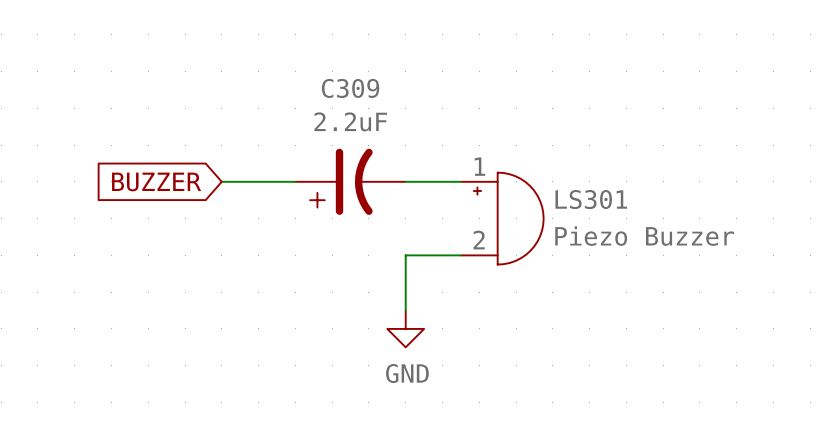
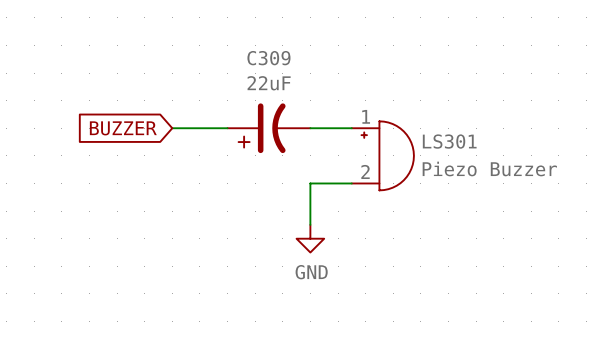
C309 value: 2.2uF (350, 121) -> 22uF (269, 83)

